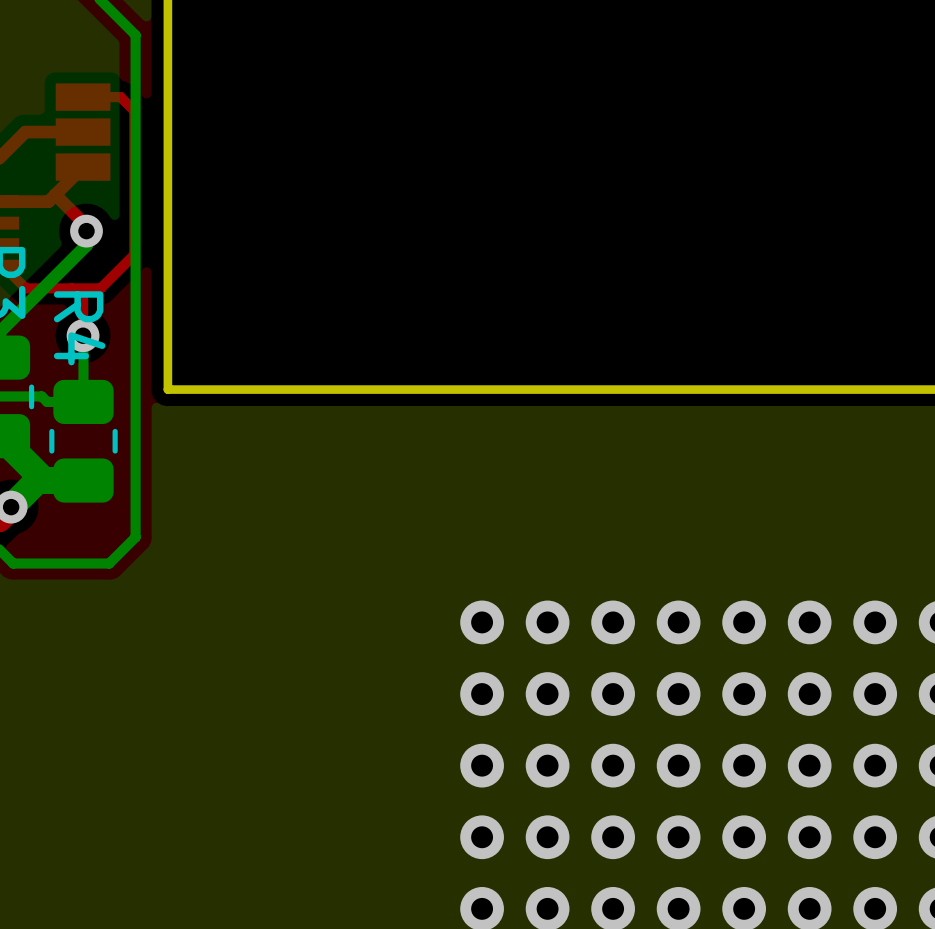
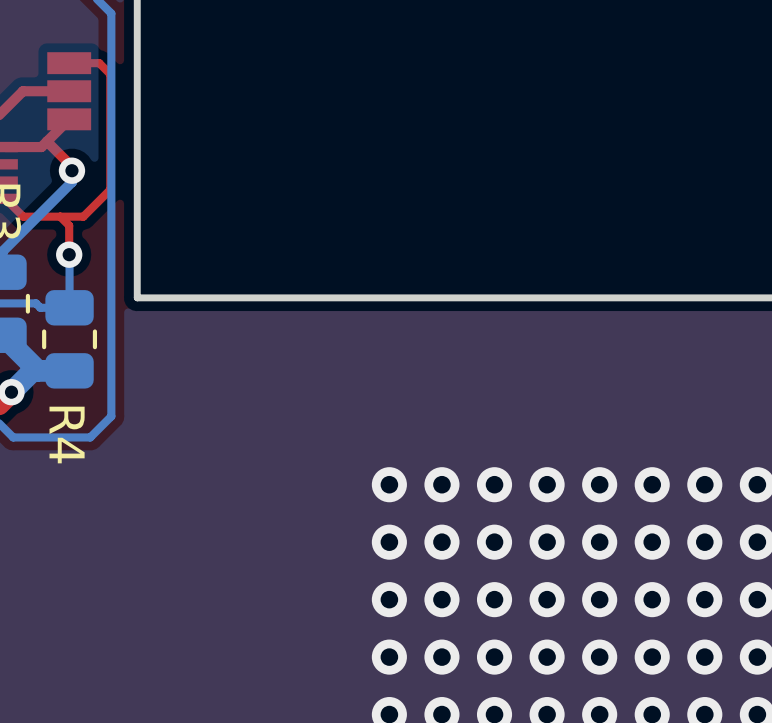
R4 name position: R4 (79, 328) -> R4 (67, 435)

